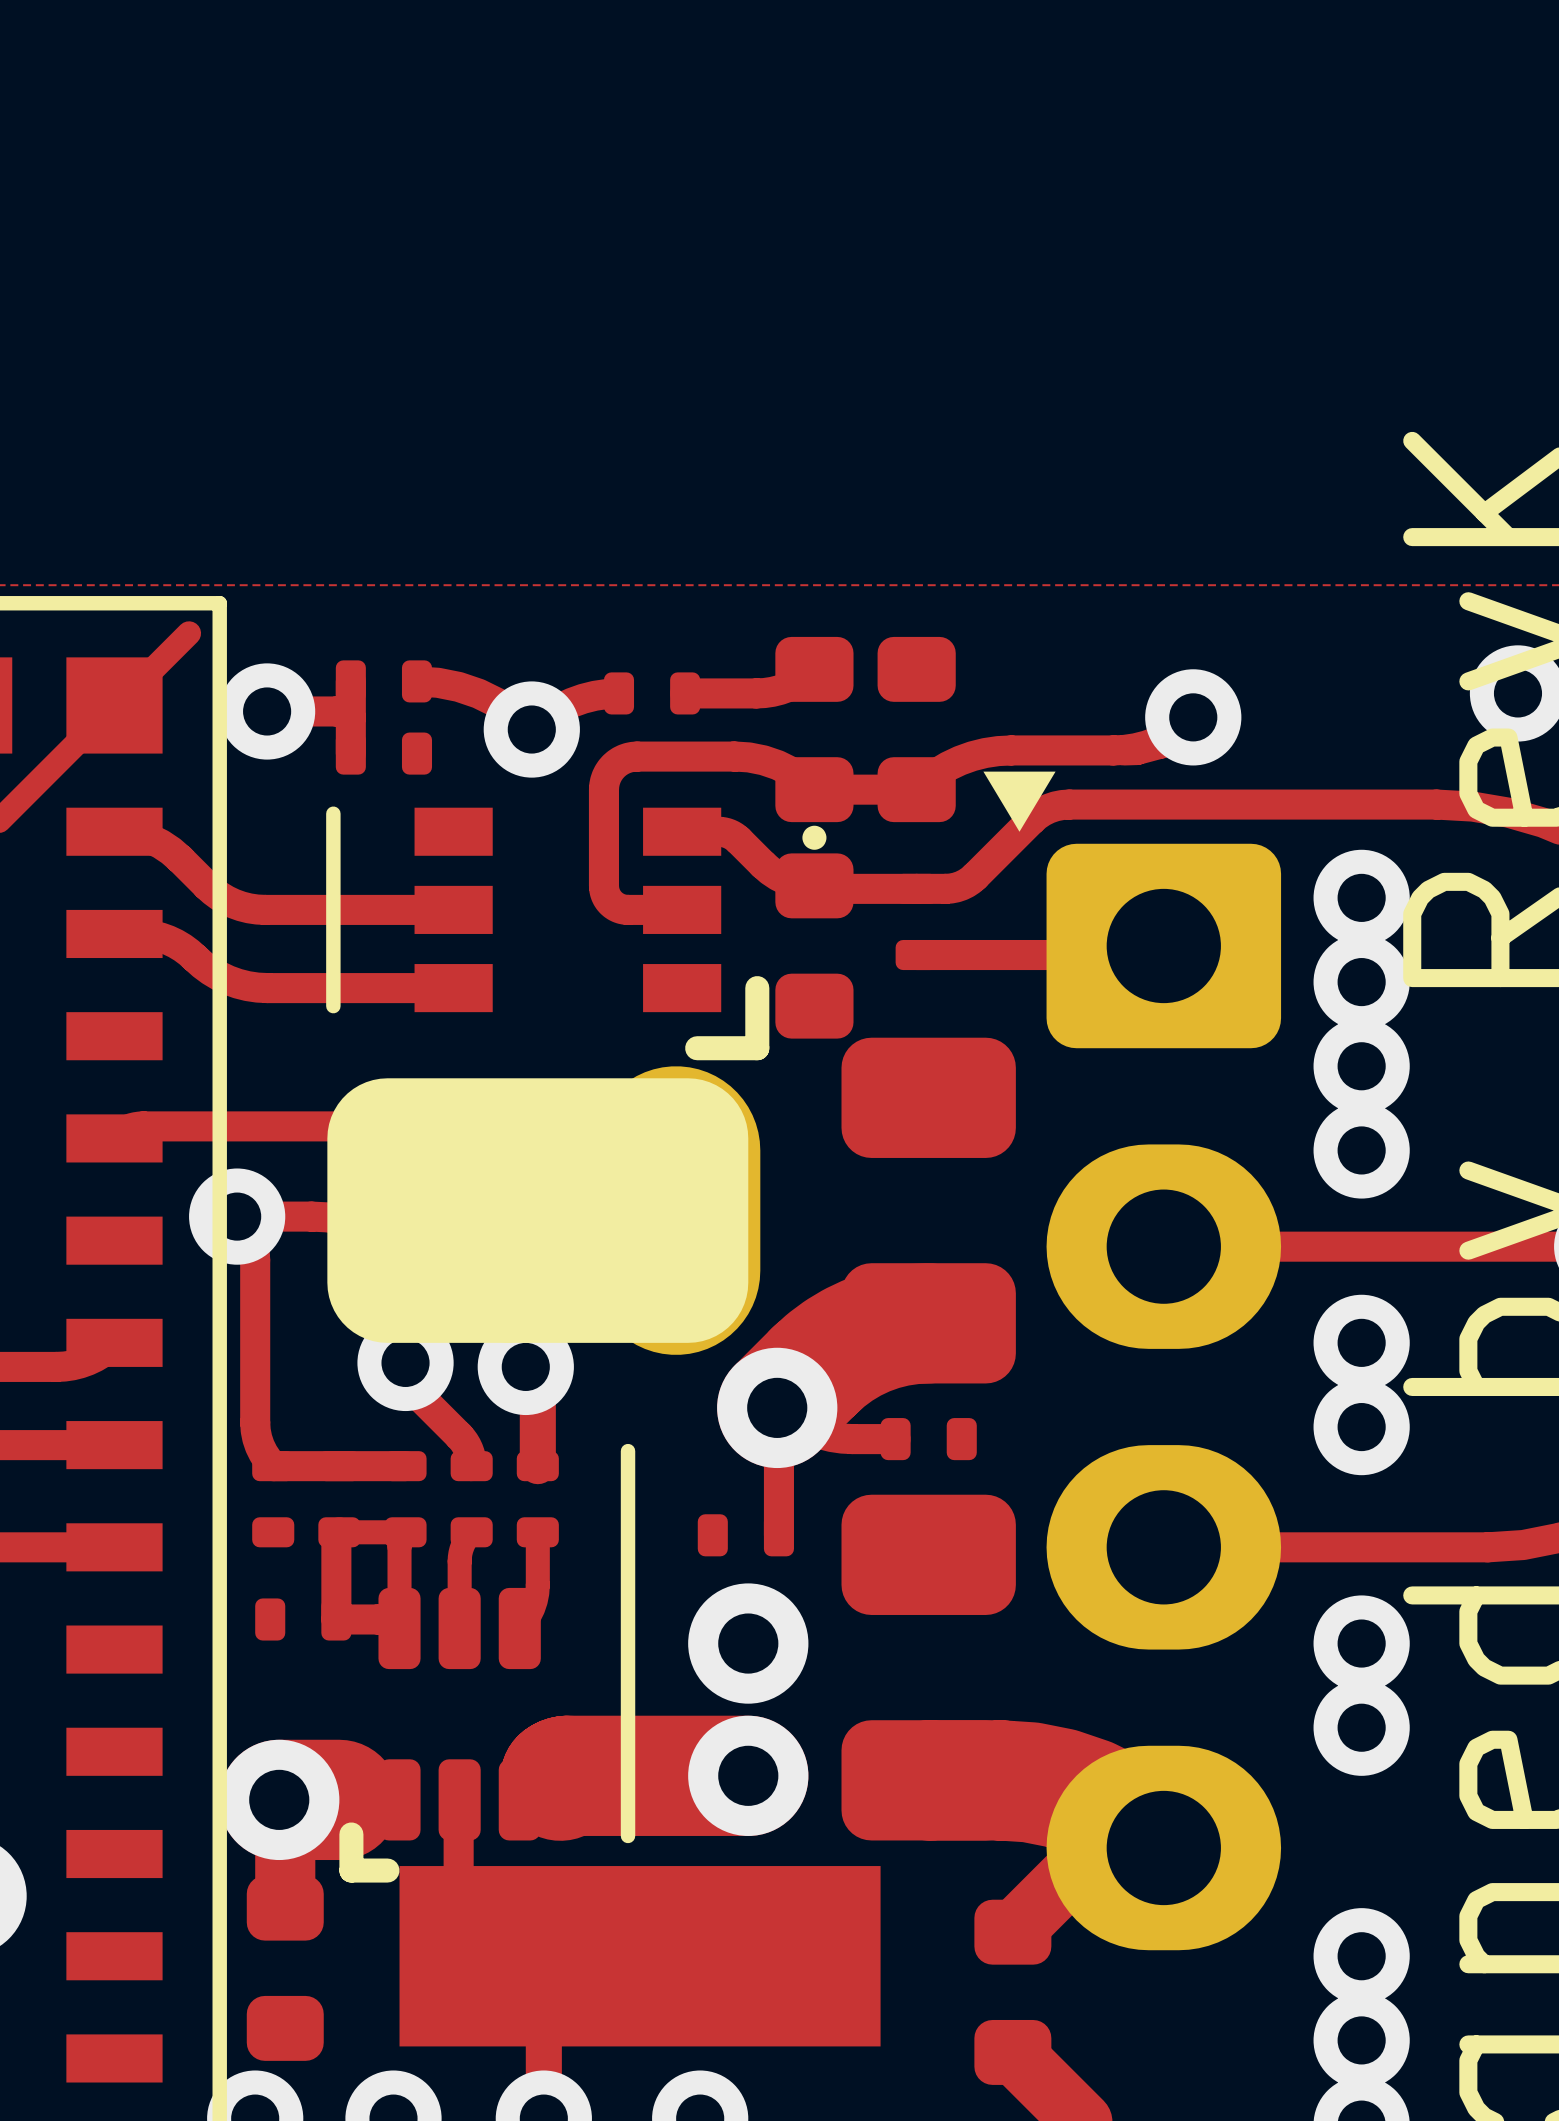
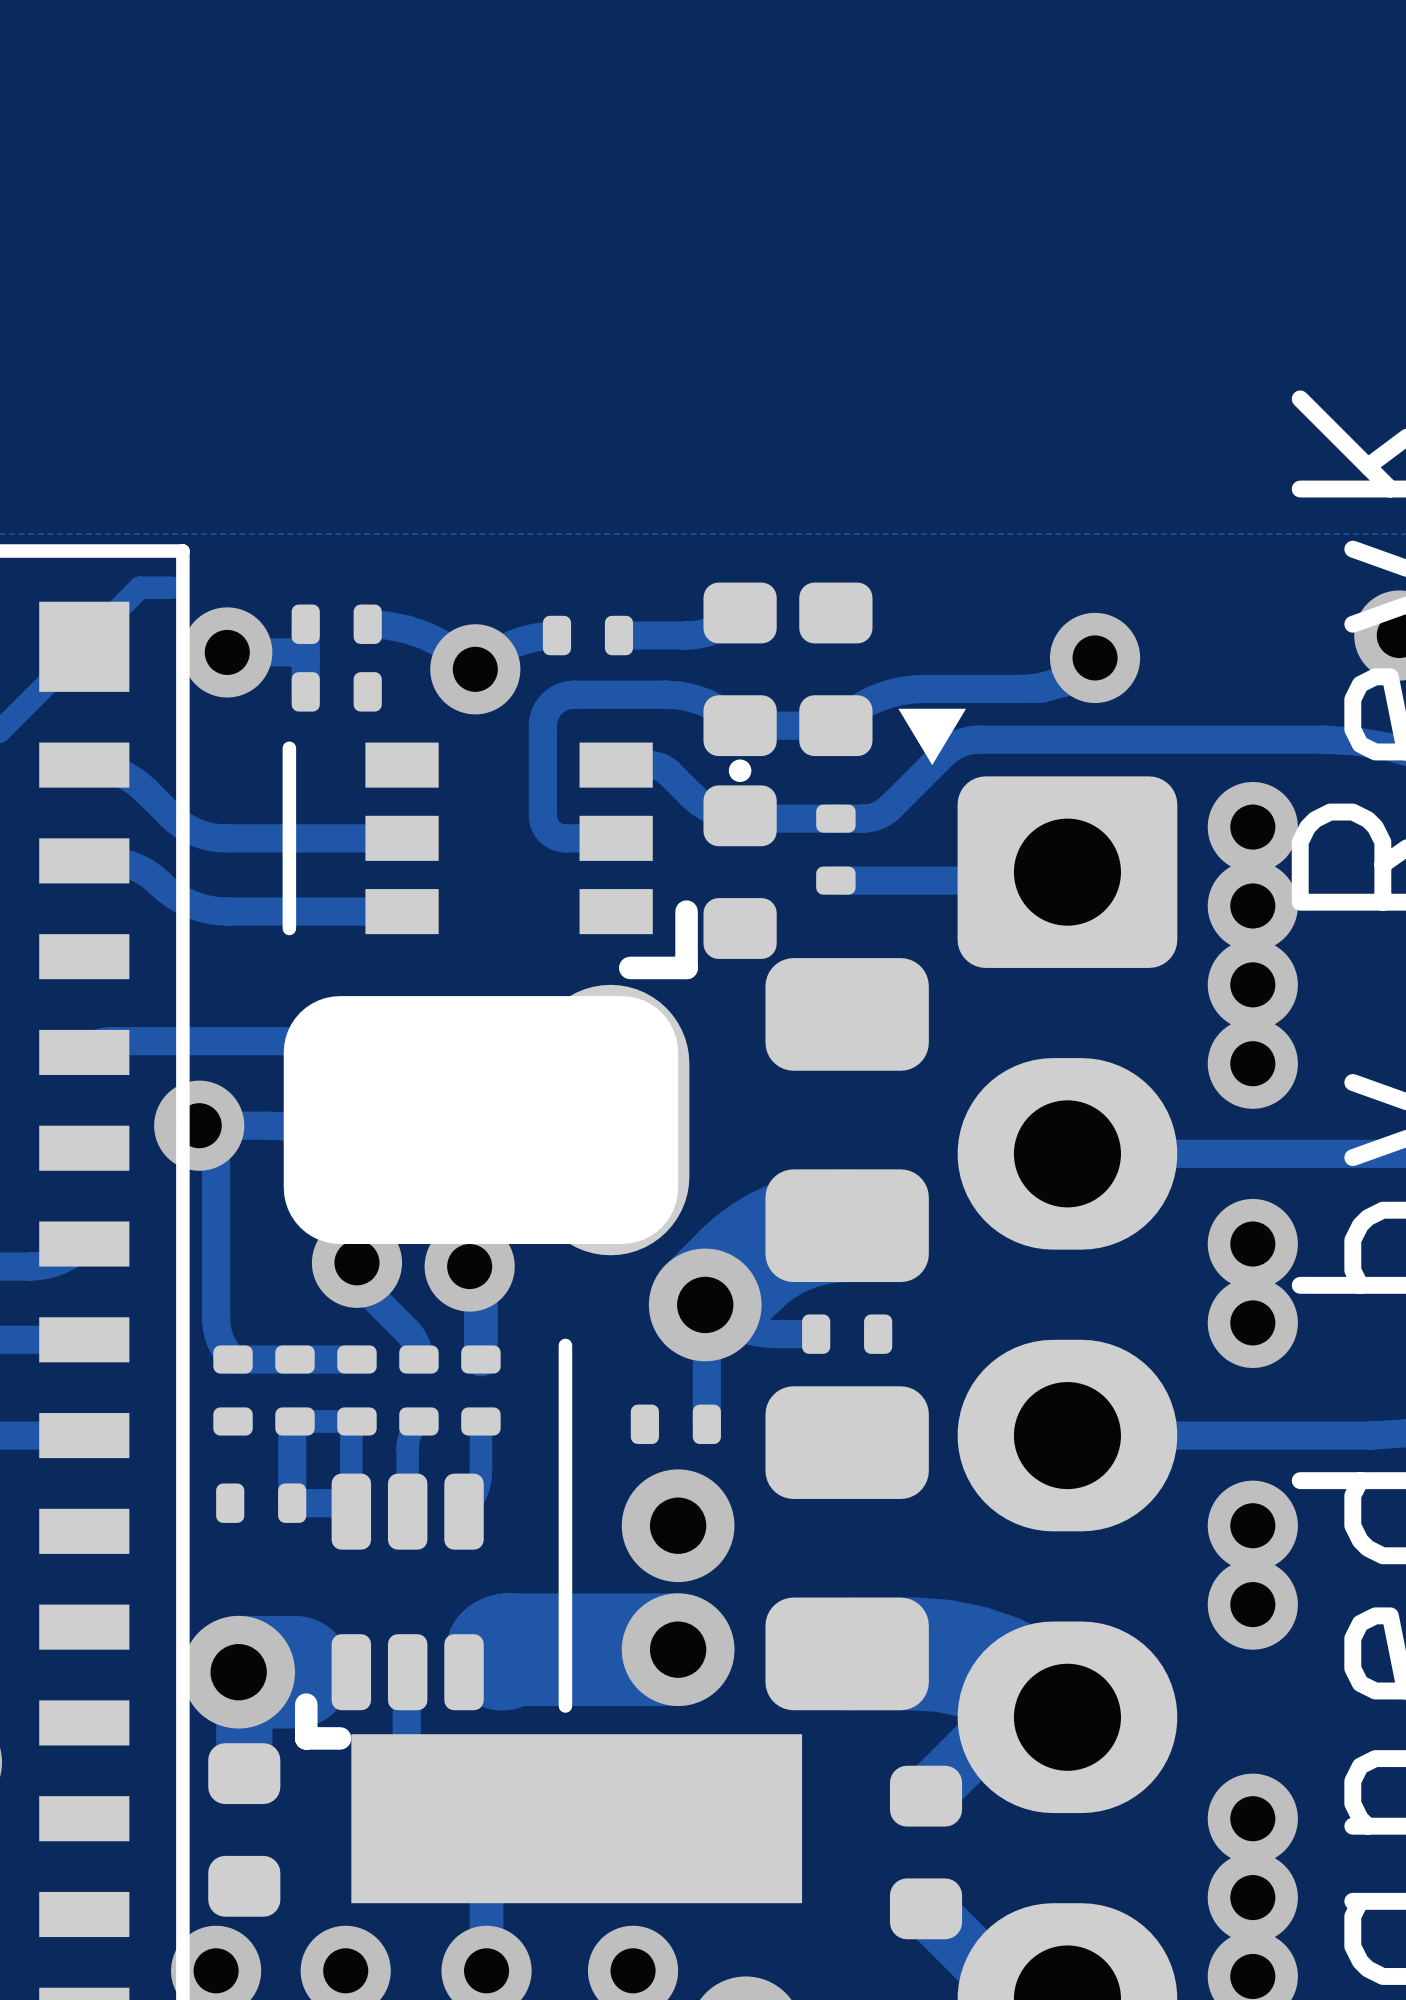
track: (189, 633) (118, 703) -> (171, 587) (139, 587) (84, 643) (84, 646)

